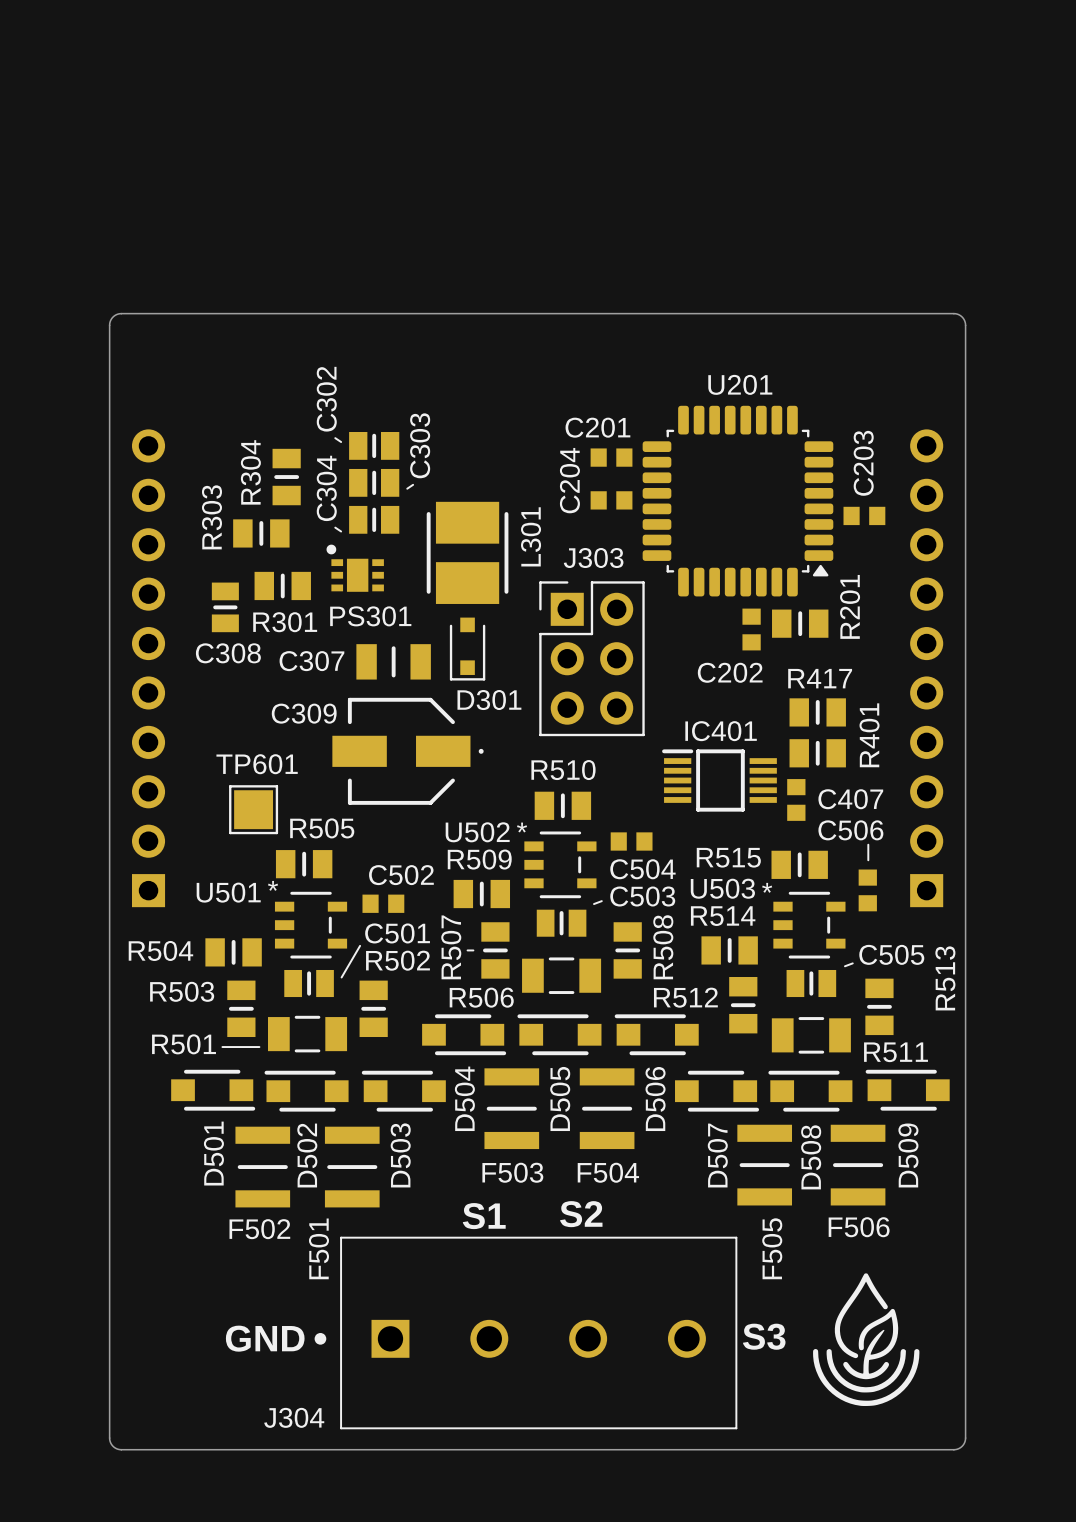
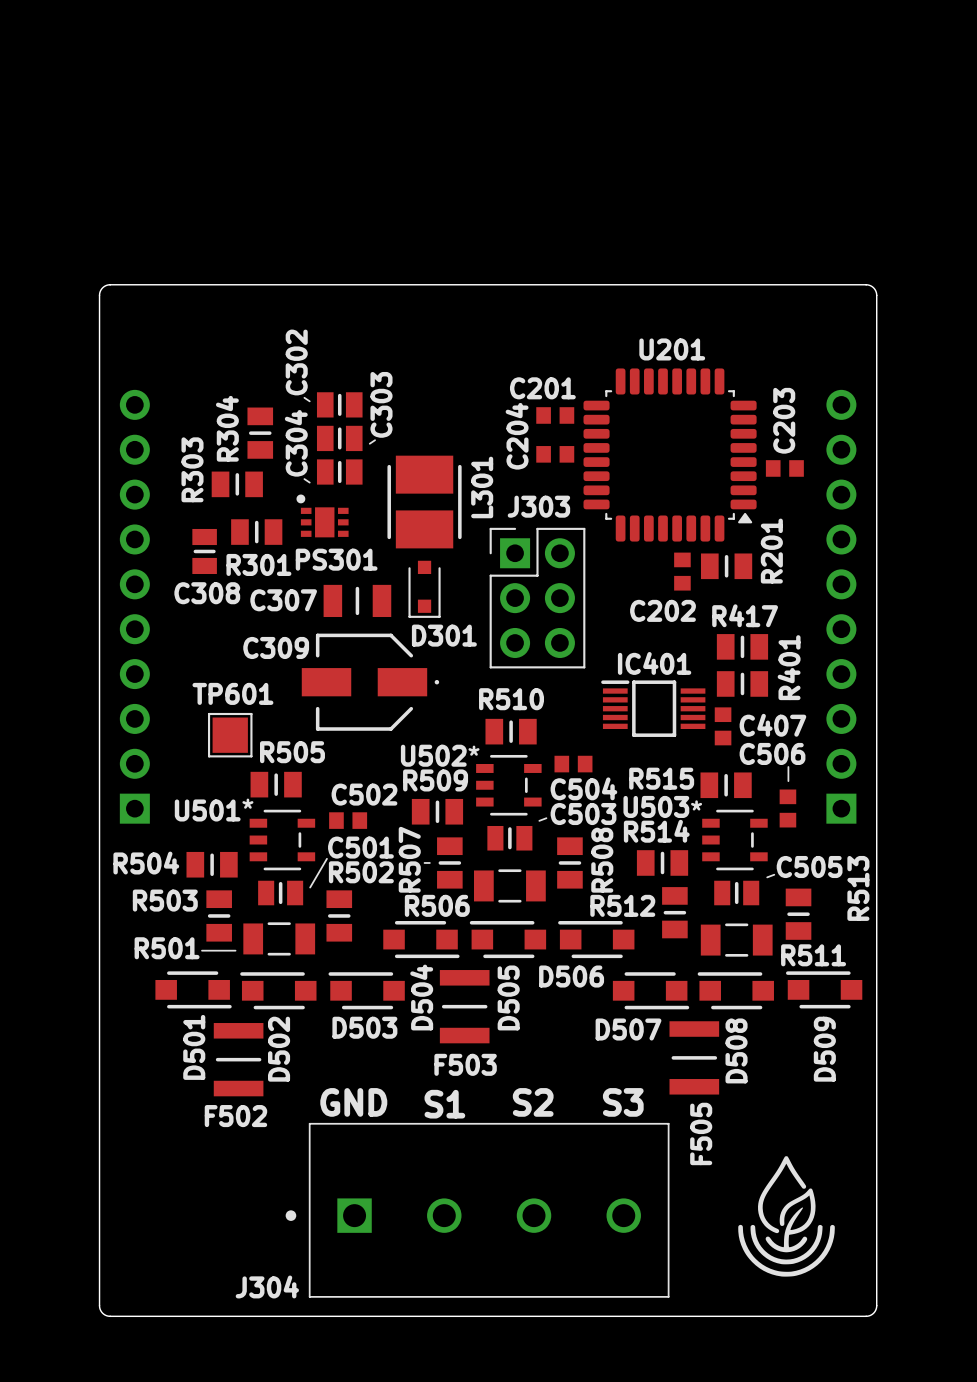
D506 name rotation: 0° (655, 1099) -> 90° clockwise (571, 976)
F504: (607, 1108) -> none
D503 name rotation: 0° (400, 1155) -> 90° clockwise (364, 1027)
D507 name rotation: 0° (717, 1155) -> 90° clockwise (628, 1029)
F506: (858, 1165) -> none
F501: (352, 1167) -> none
text position: S3 (764, 1336) -> S3 (623, 1102)
text position: GND (265, 1338) -> GND (353, 1102)

